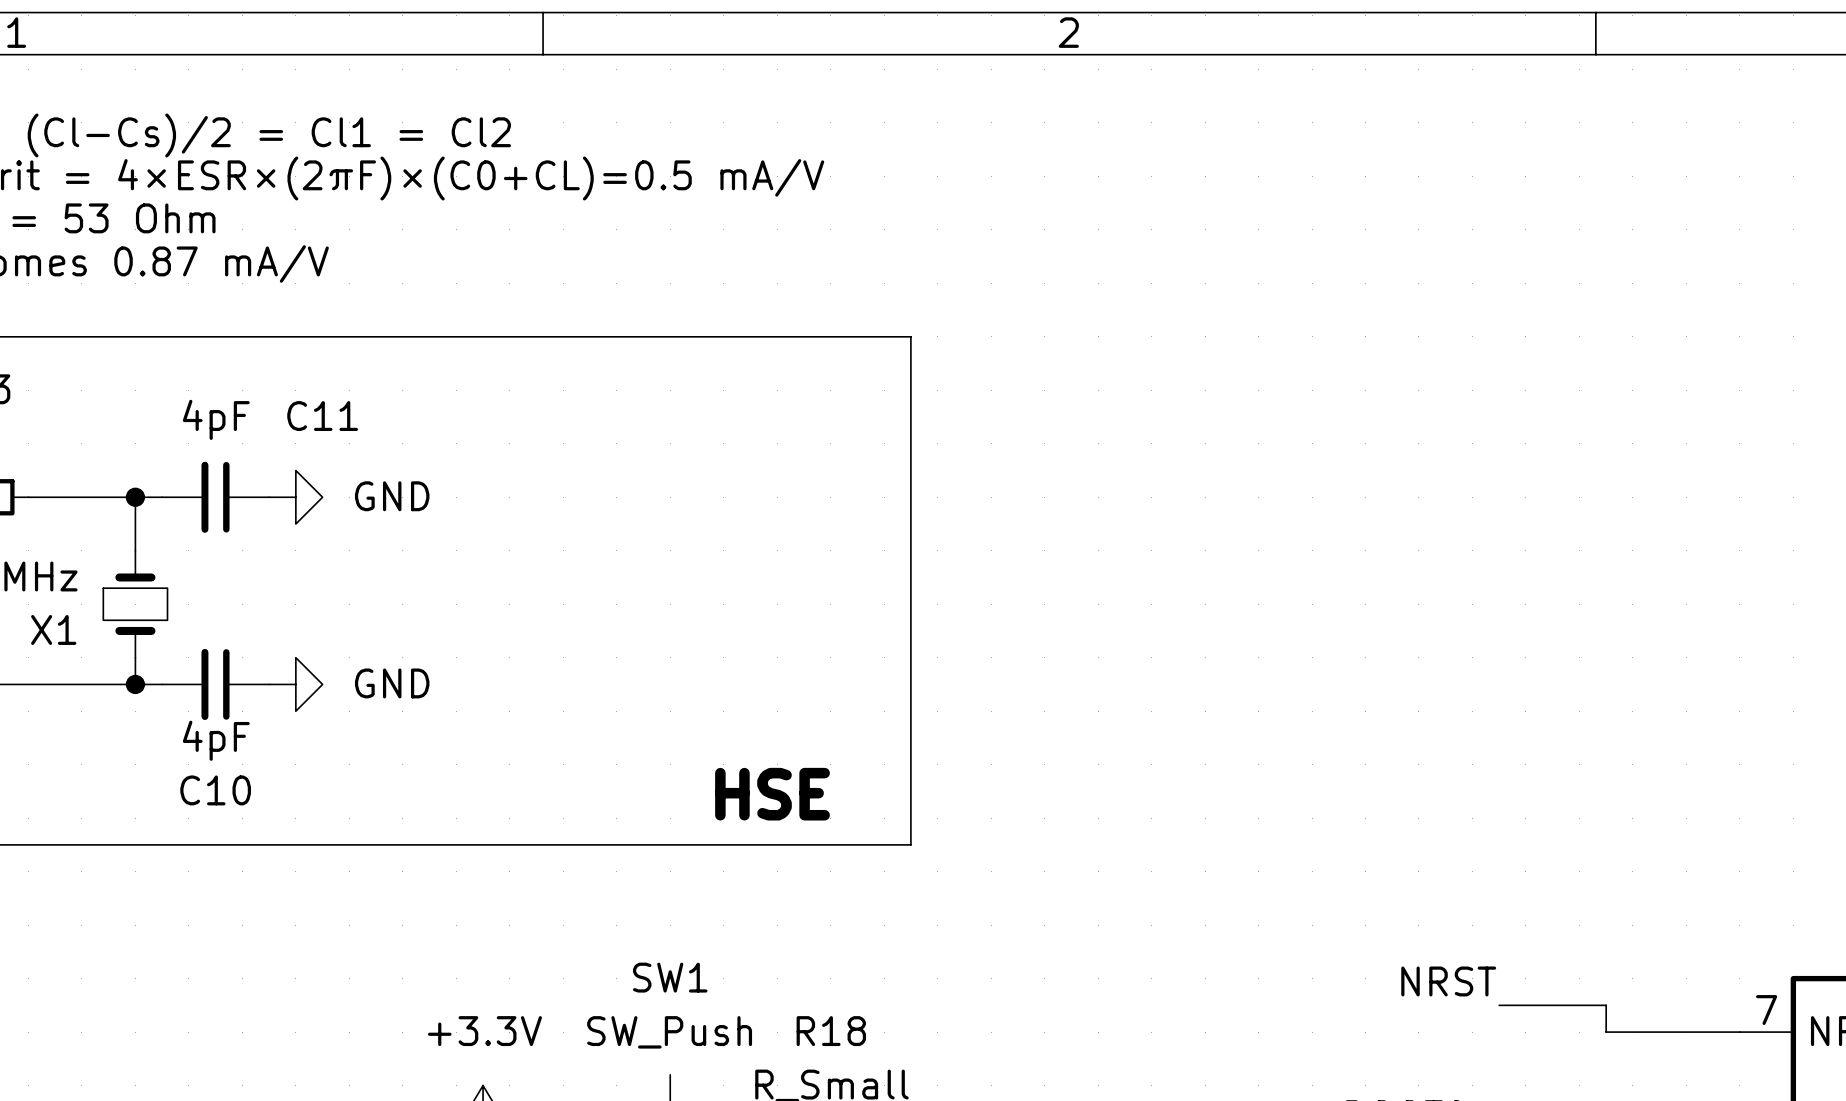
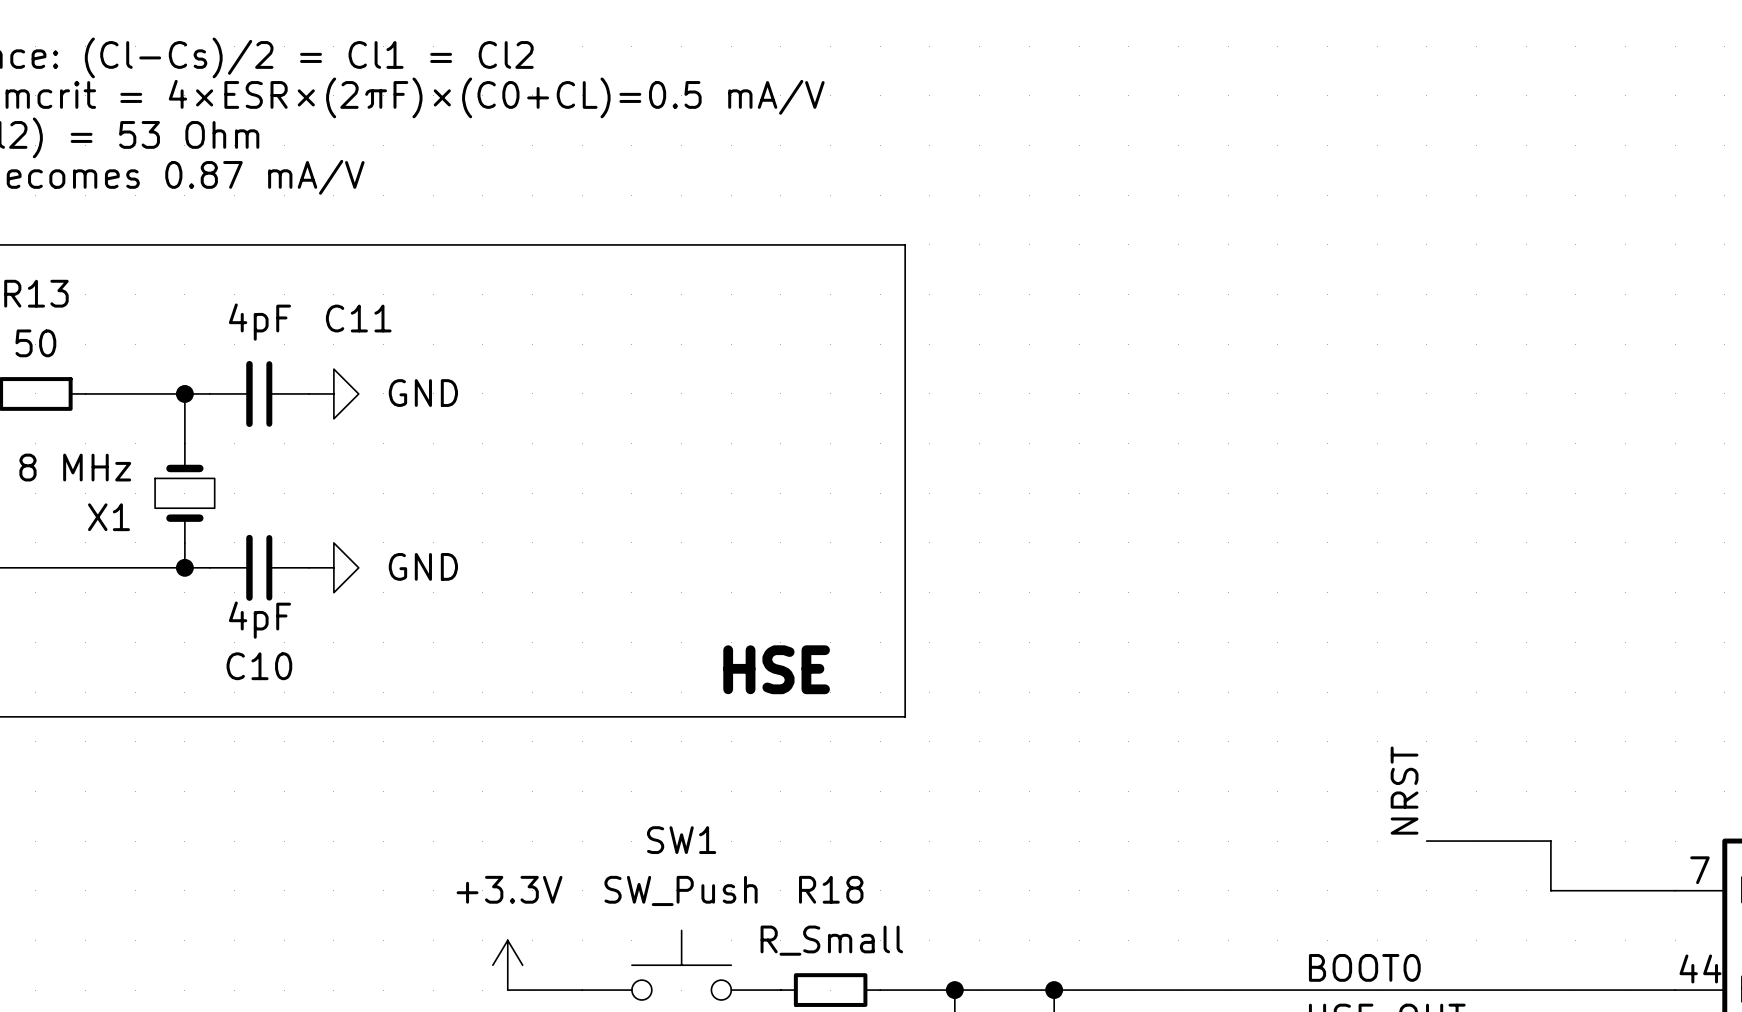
label rotation: 0° (1448, 981) -> 90° counterclockwise (1404, 790)
wire: (1499, 1005) (1606, 1005) -> (1426, 841) (1550, 841) (1550, 865)

